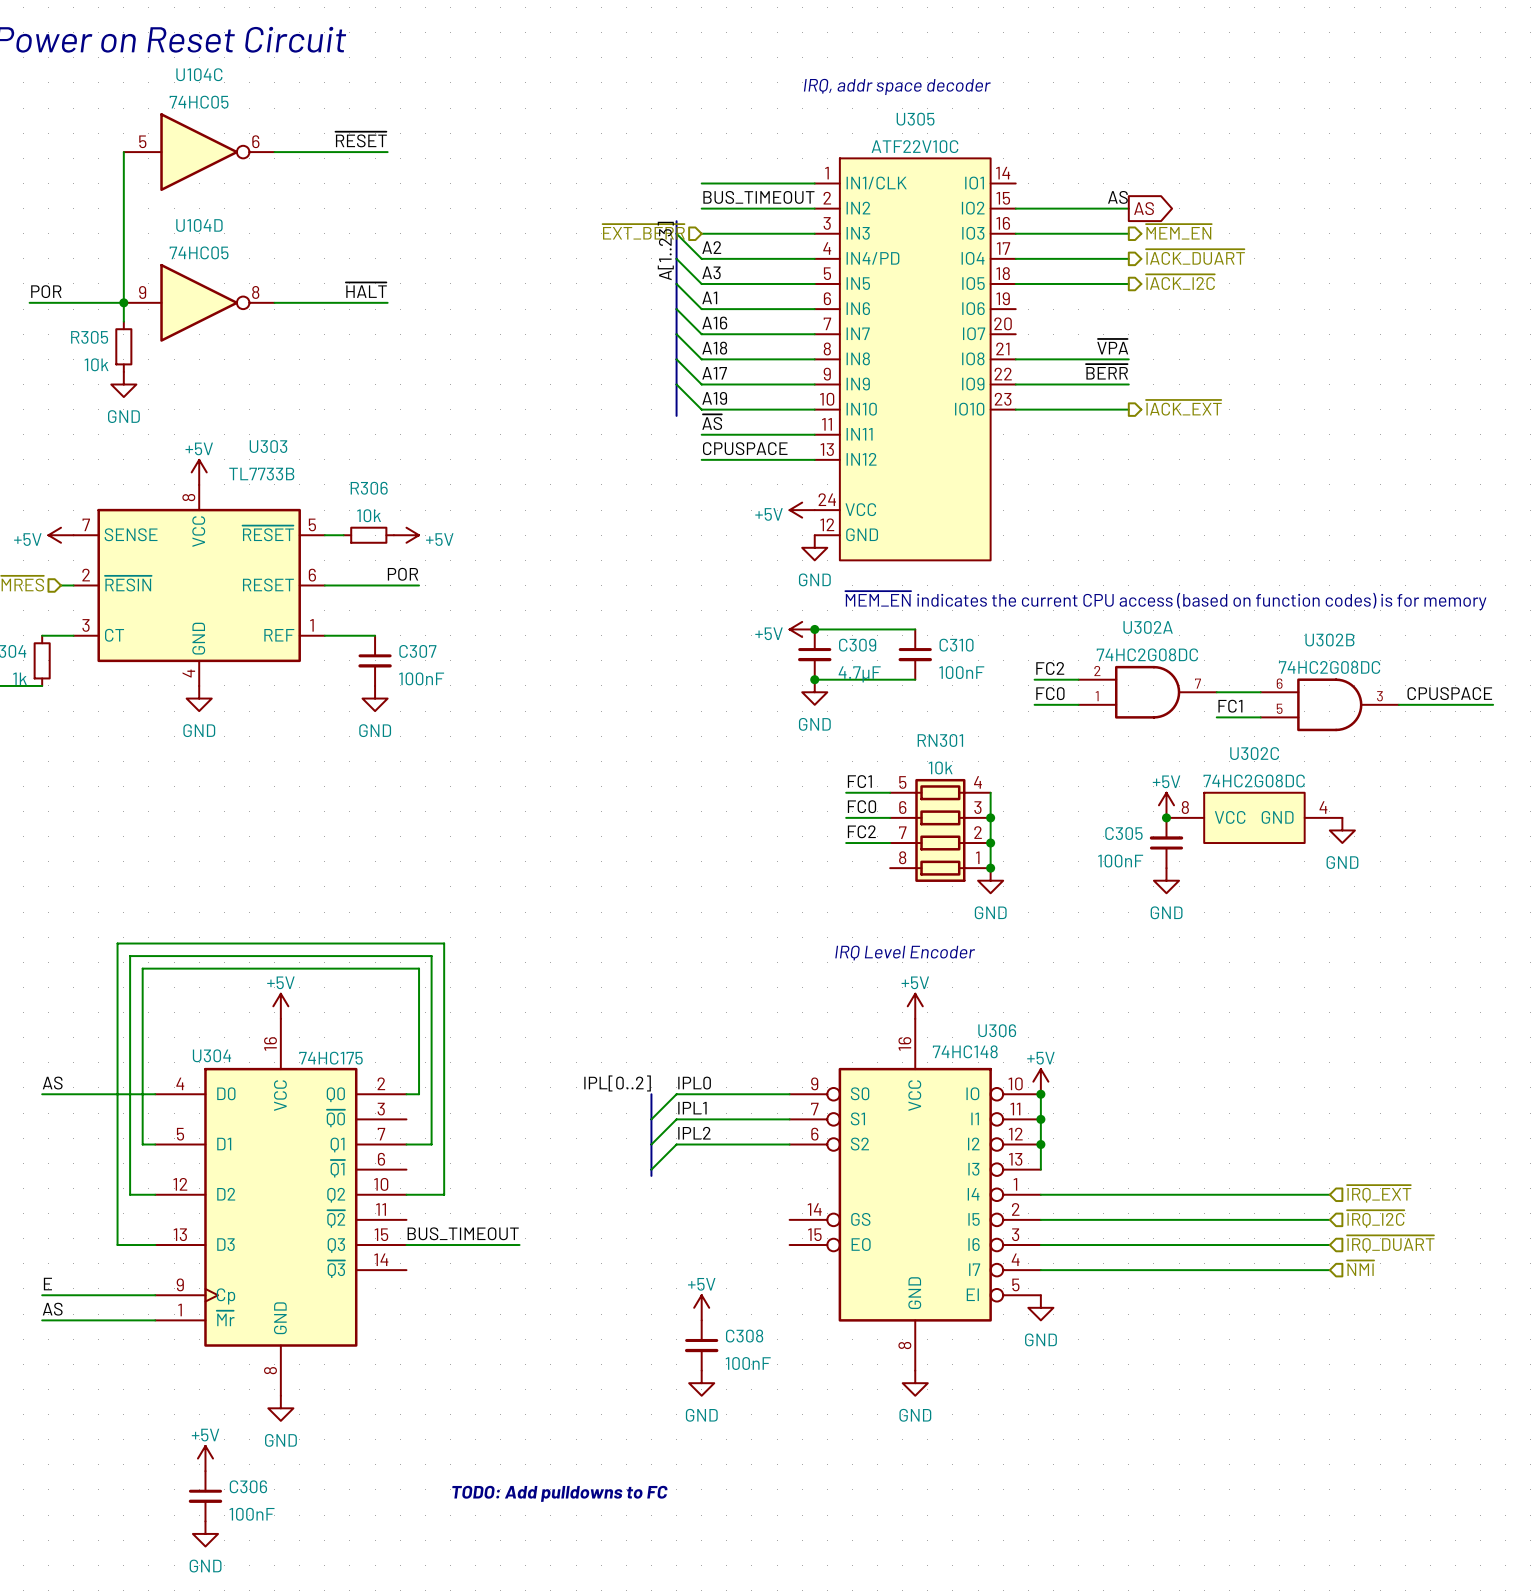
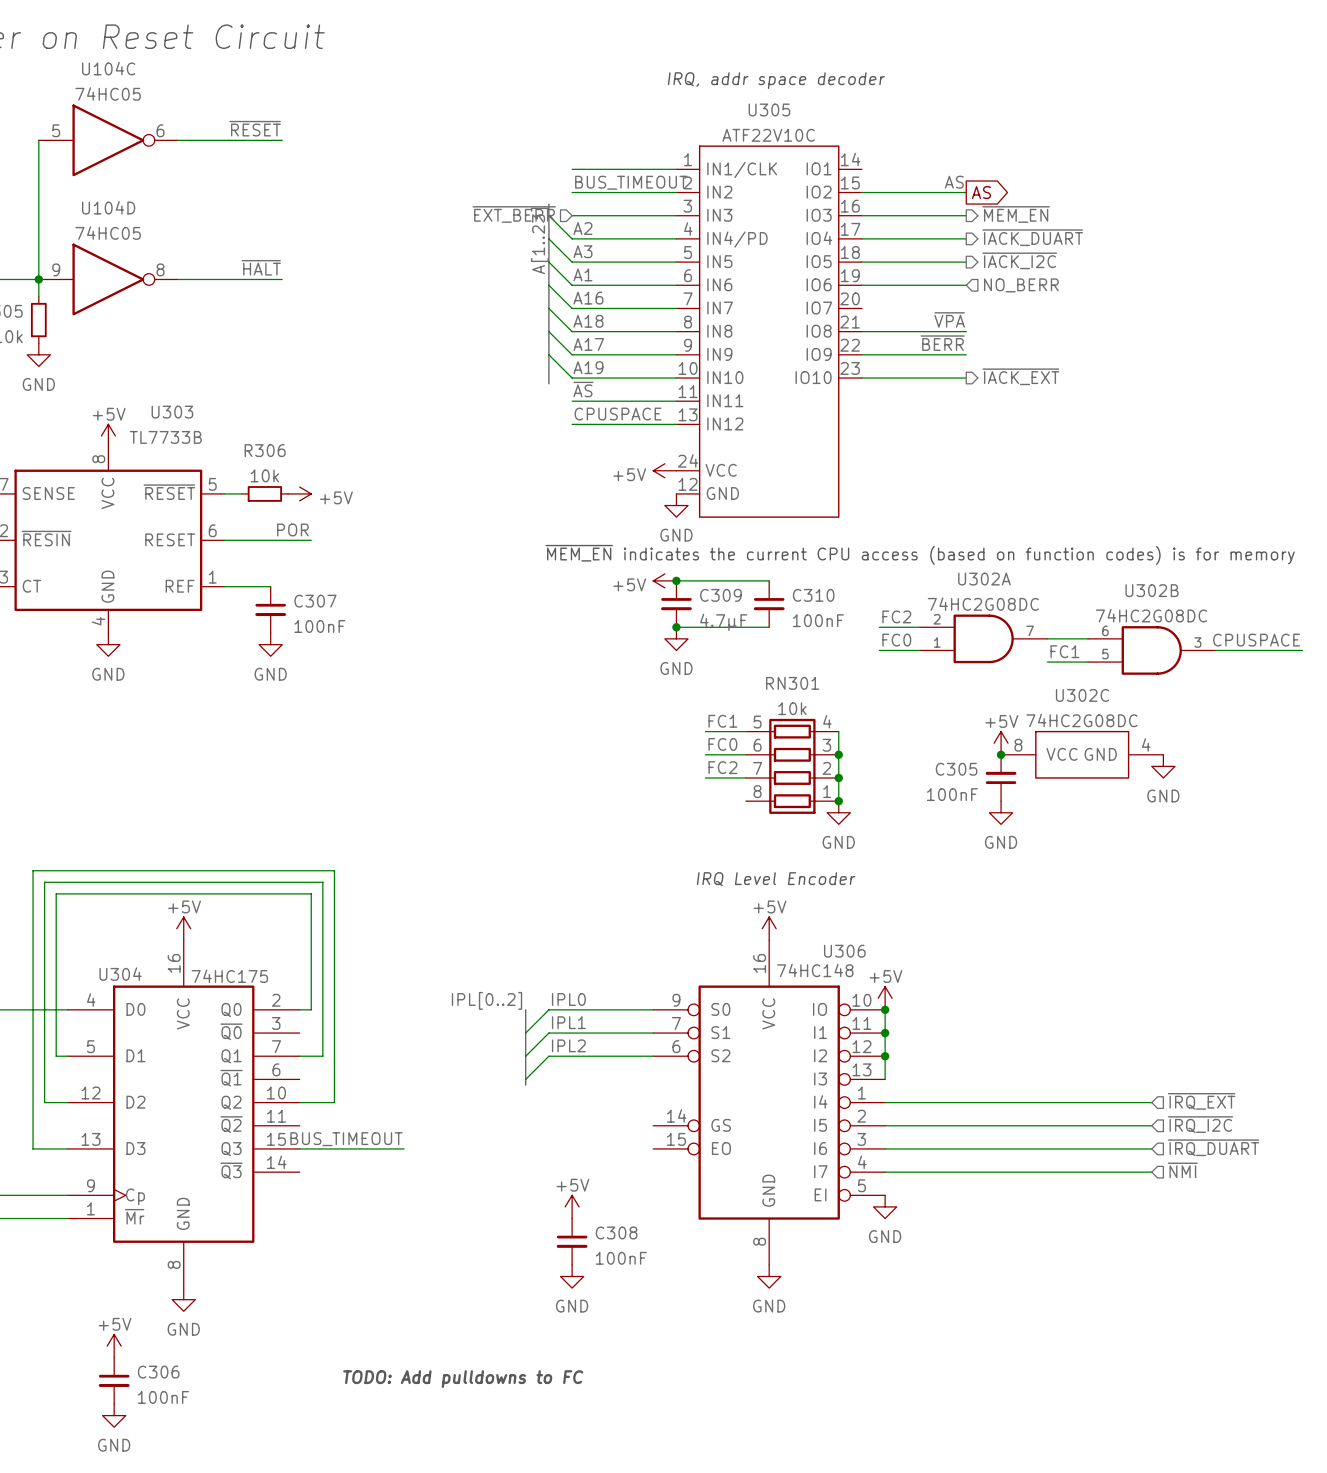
hierarchical label: none -> NO_BERR (1021, 285)
wire: none -> (861, 285) (966, 285)

